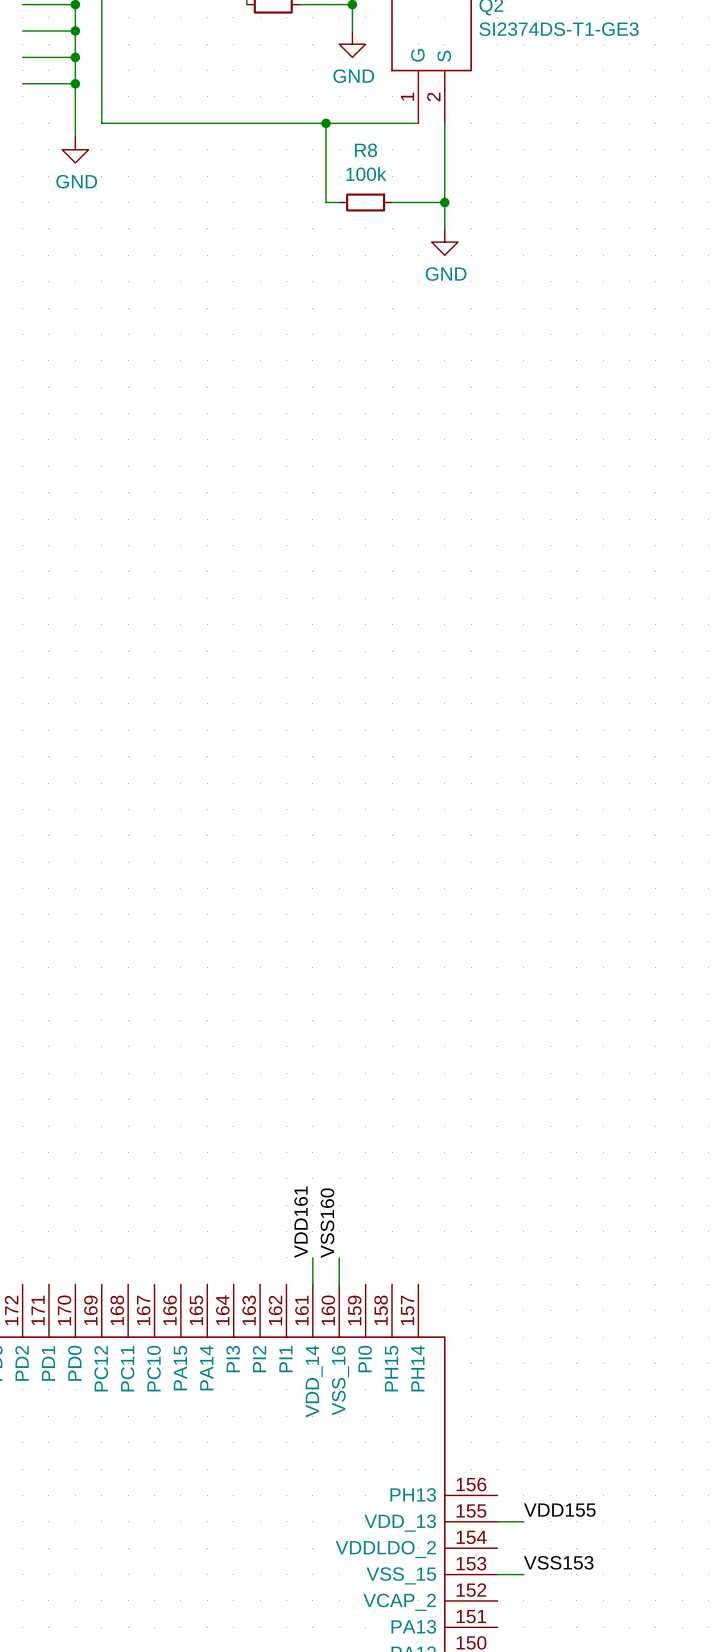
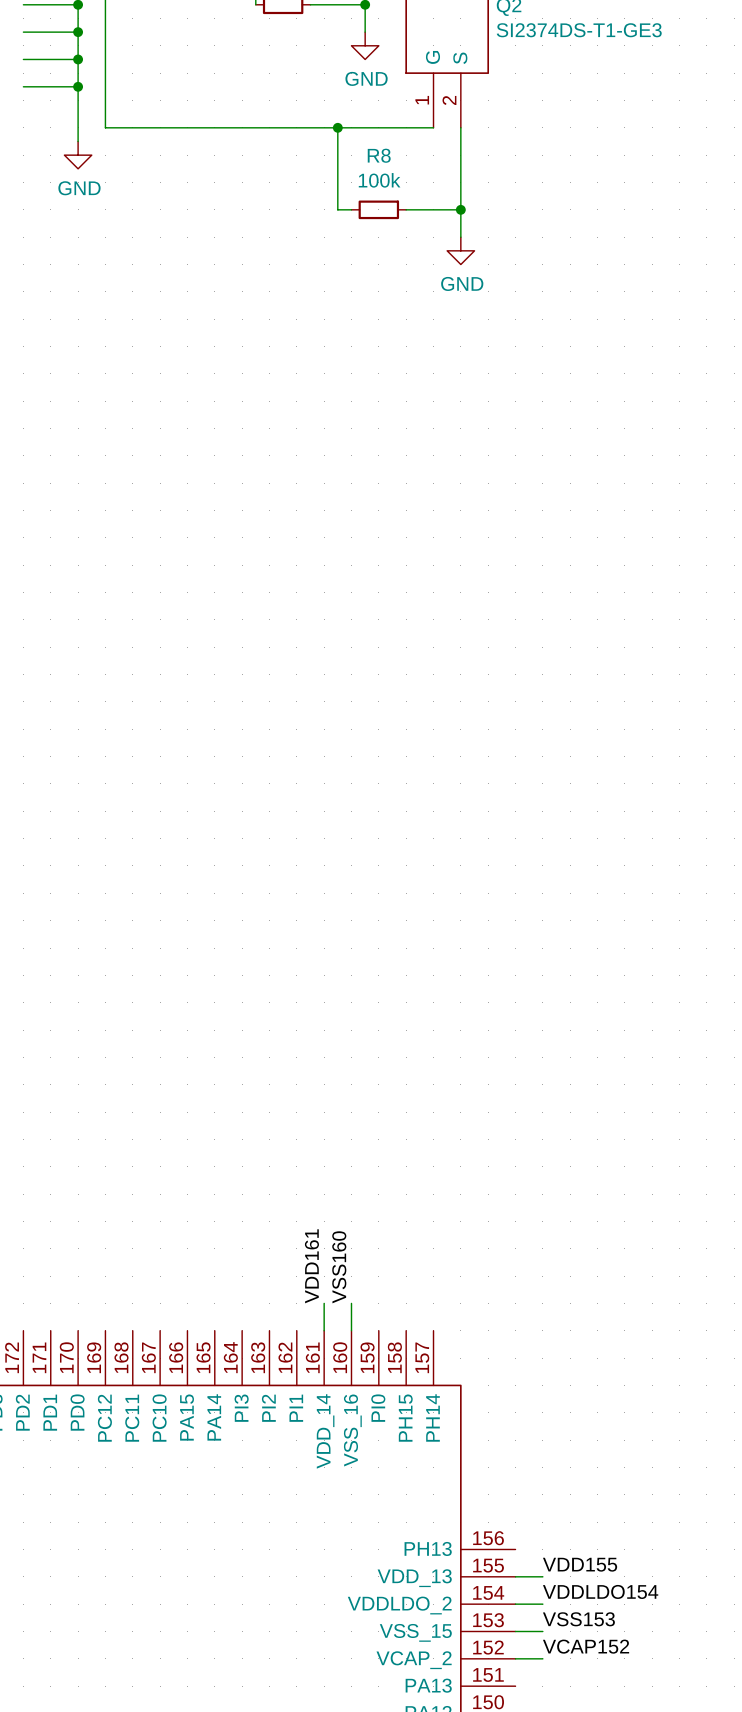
label: none -> VDDLDO154 (600, 1591)
wire: none -> (515, 1604) (542, 1604)
label: none -> VCAP152 (586, 1646)
wire: none -> (515, 1658) (542, 1658)

